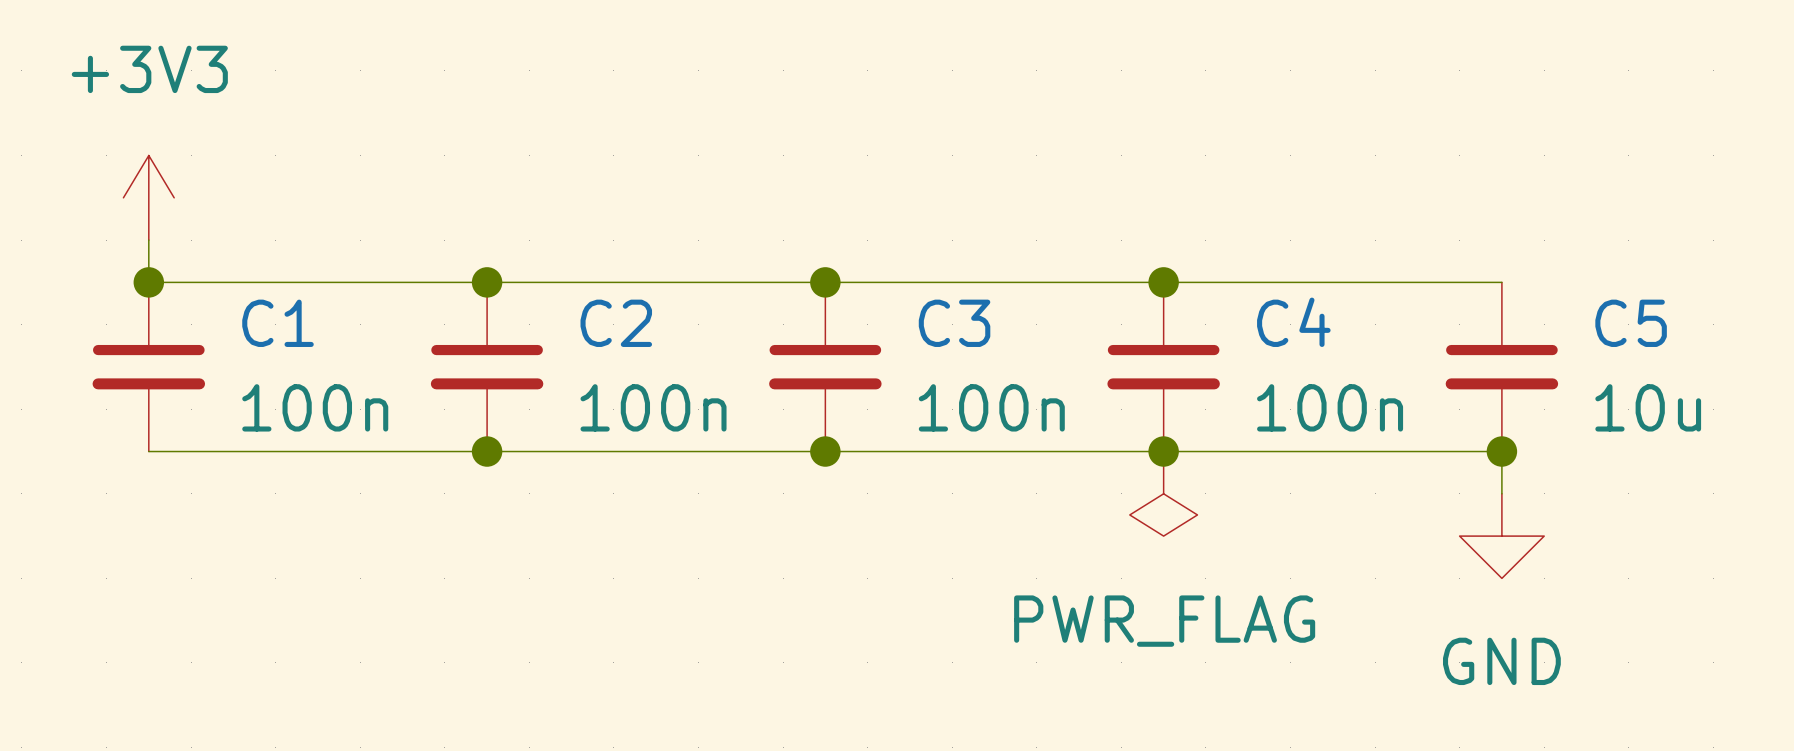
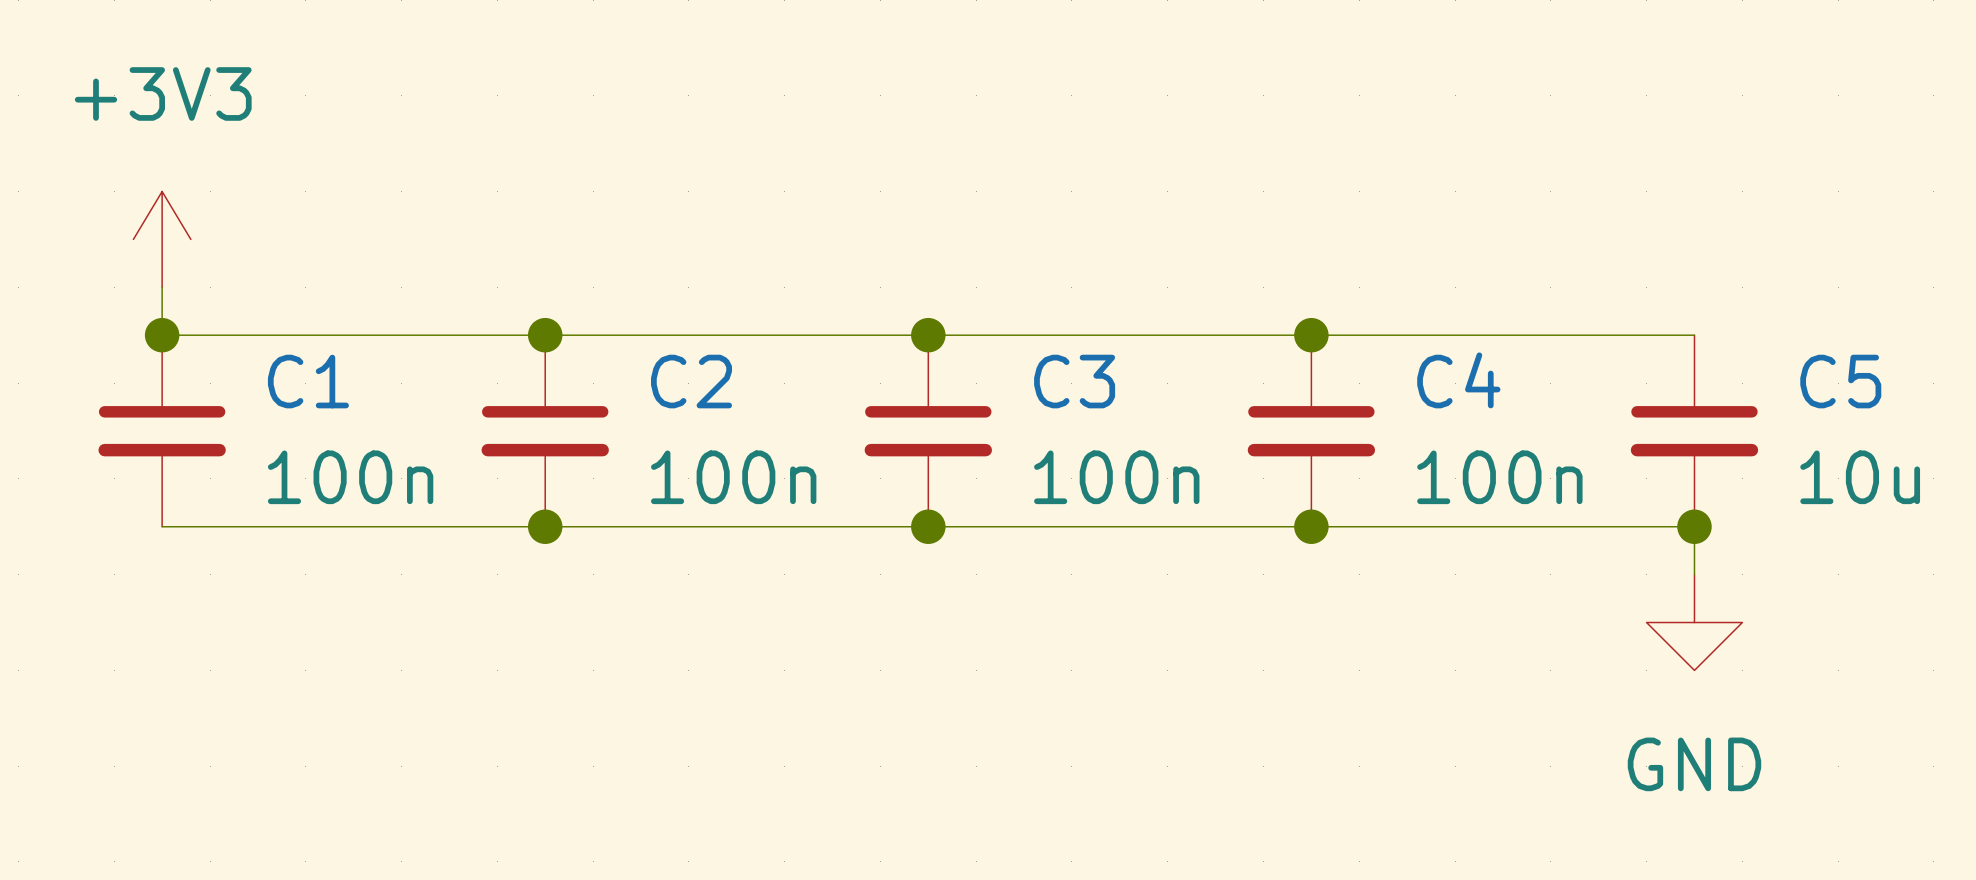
power symbol: PWR_FLAG (1163, 493) -> none

